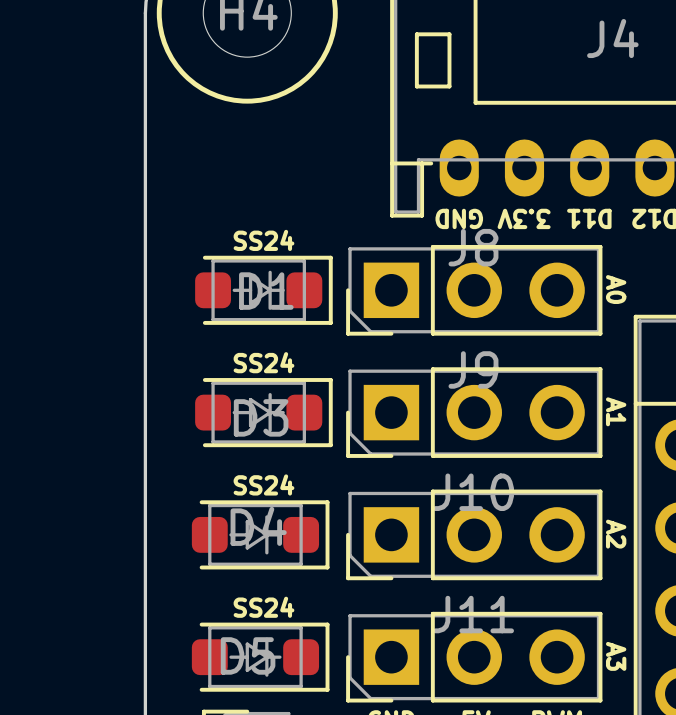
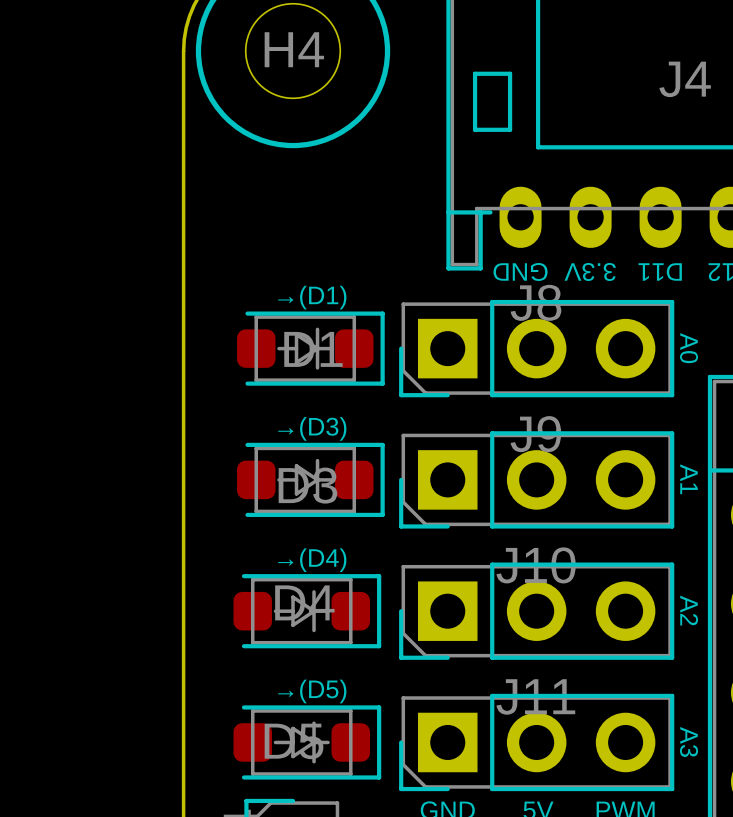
text: SS24 (263, 240) -> →(D1) (312, 297)
text: SS24 (263, 362) -> →(D3) (312, 428)
text: SS24 (263, 484) -> →(D4) (312, 560)
text: SS24 (263, 607) -> →(D5) (312, 691)

